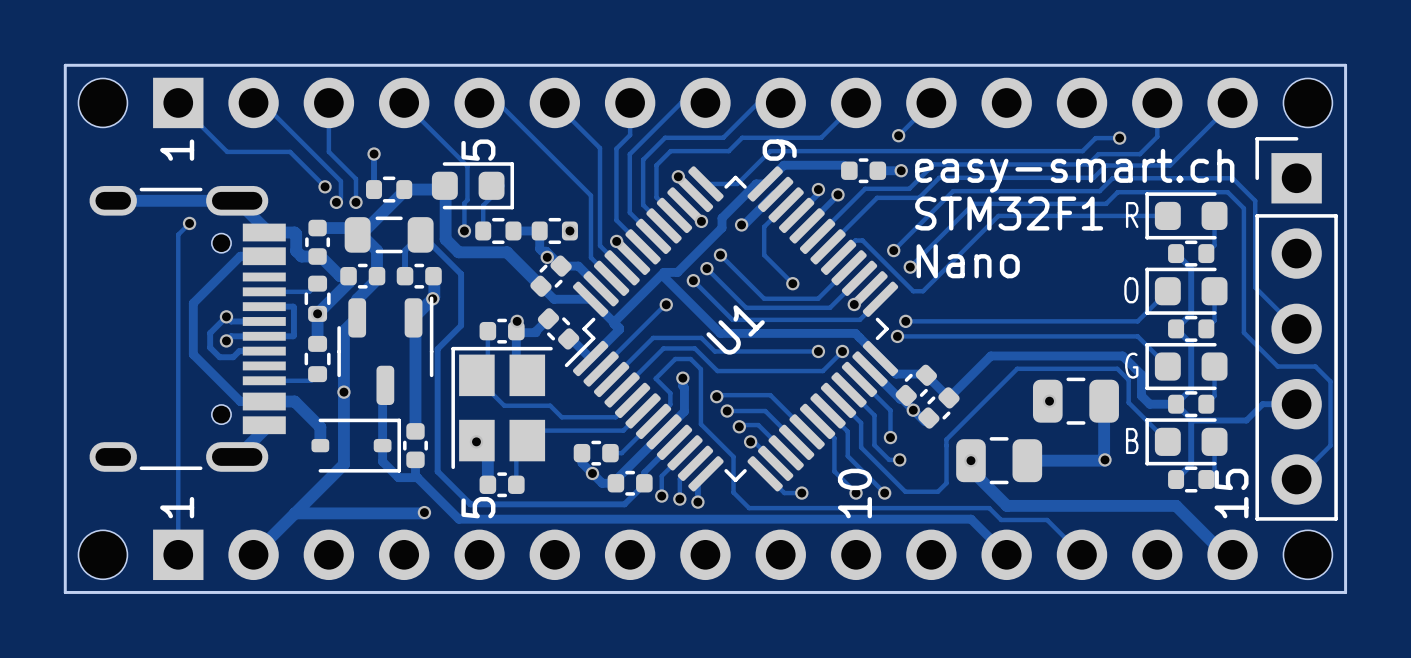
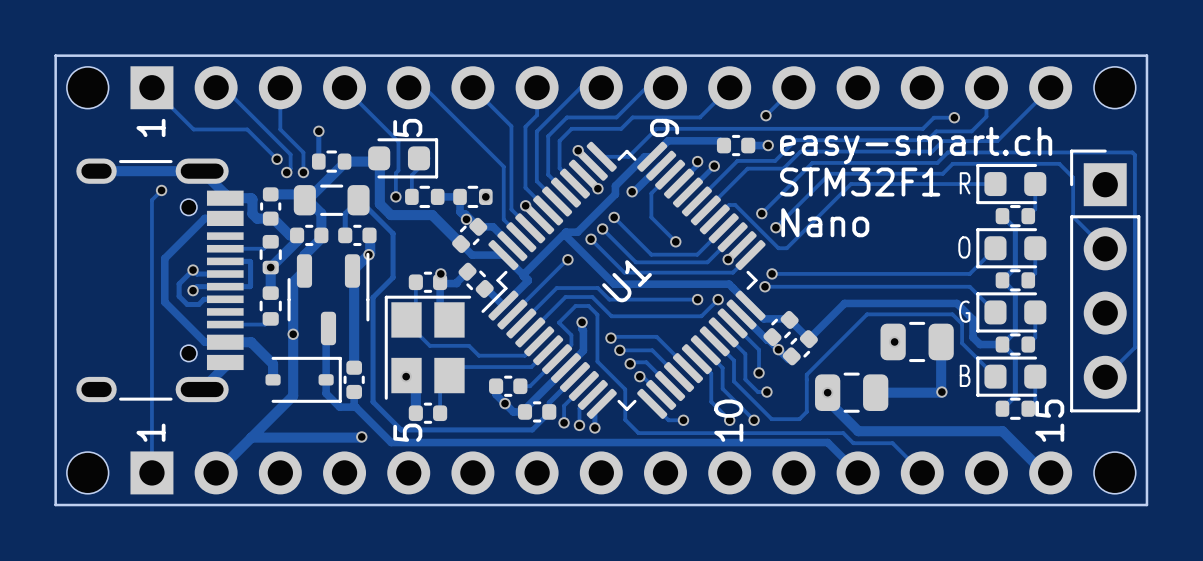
part footprint: [1255, 137, 1338, 521] -> [1070, 149, 1141, 413]
track: (1112, 178) (1232, 178) (1255, 200) (1255, 287) (1296, 328) -> (947, 152) (1132, 152) (1134, 154) (1134, 347) (1105, 377)
track: (1227, 192) (1243, 208) (1243, 332) (1277, 366) (1315, 366) (1330, 381) (1330, 445) (1296, 479) -> (1046, 163) (1059, 163) (1073, 177) (1073, 216) (1105, 248)
track: (1296, 404) (1262, 404) (1246, 420) (1191, 419) -> none

